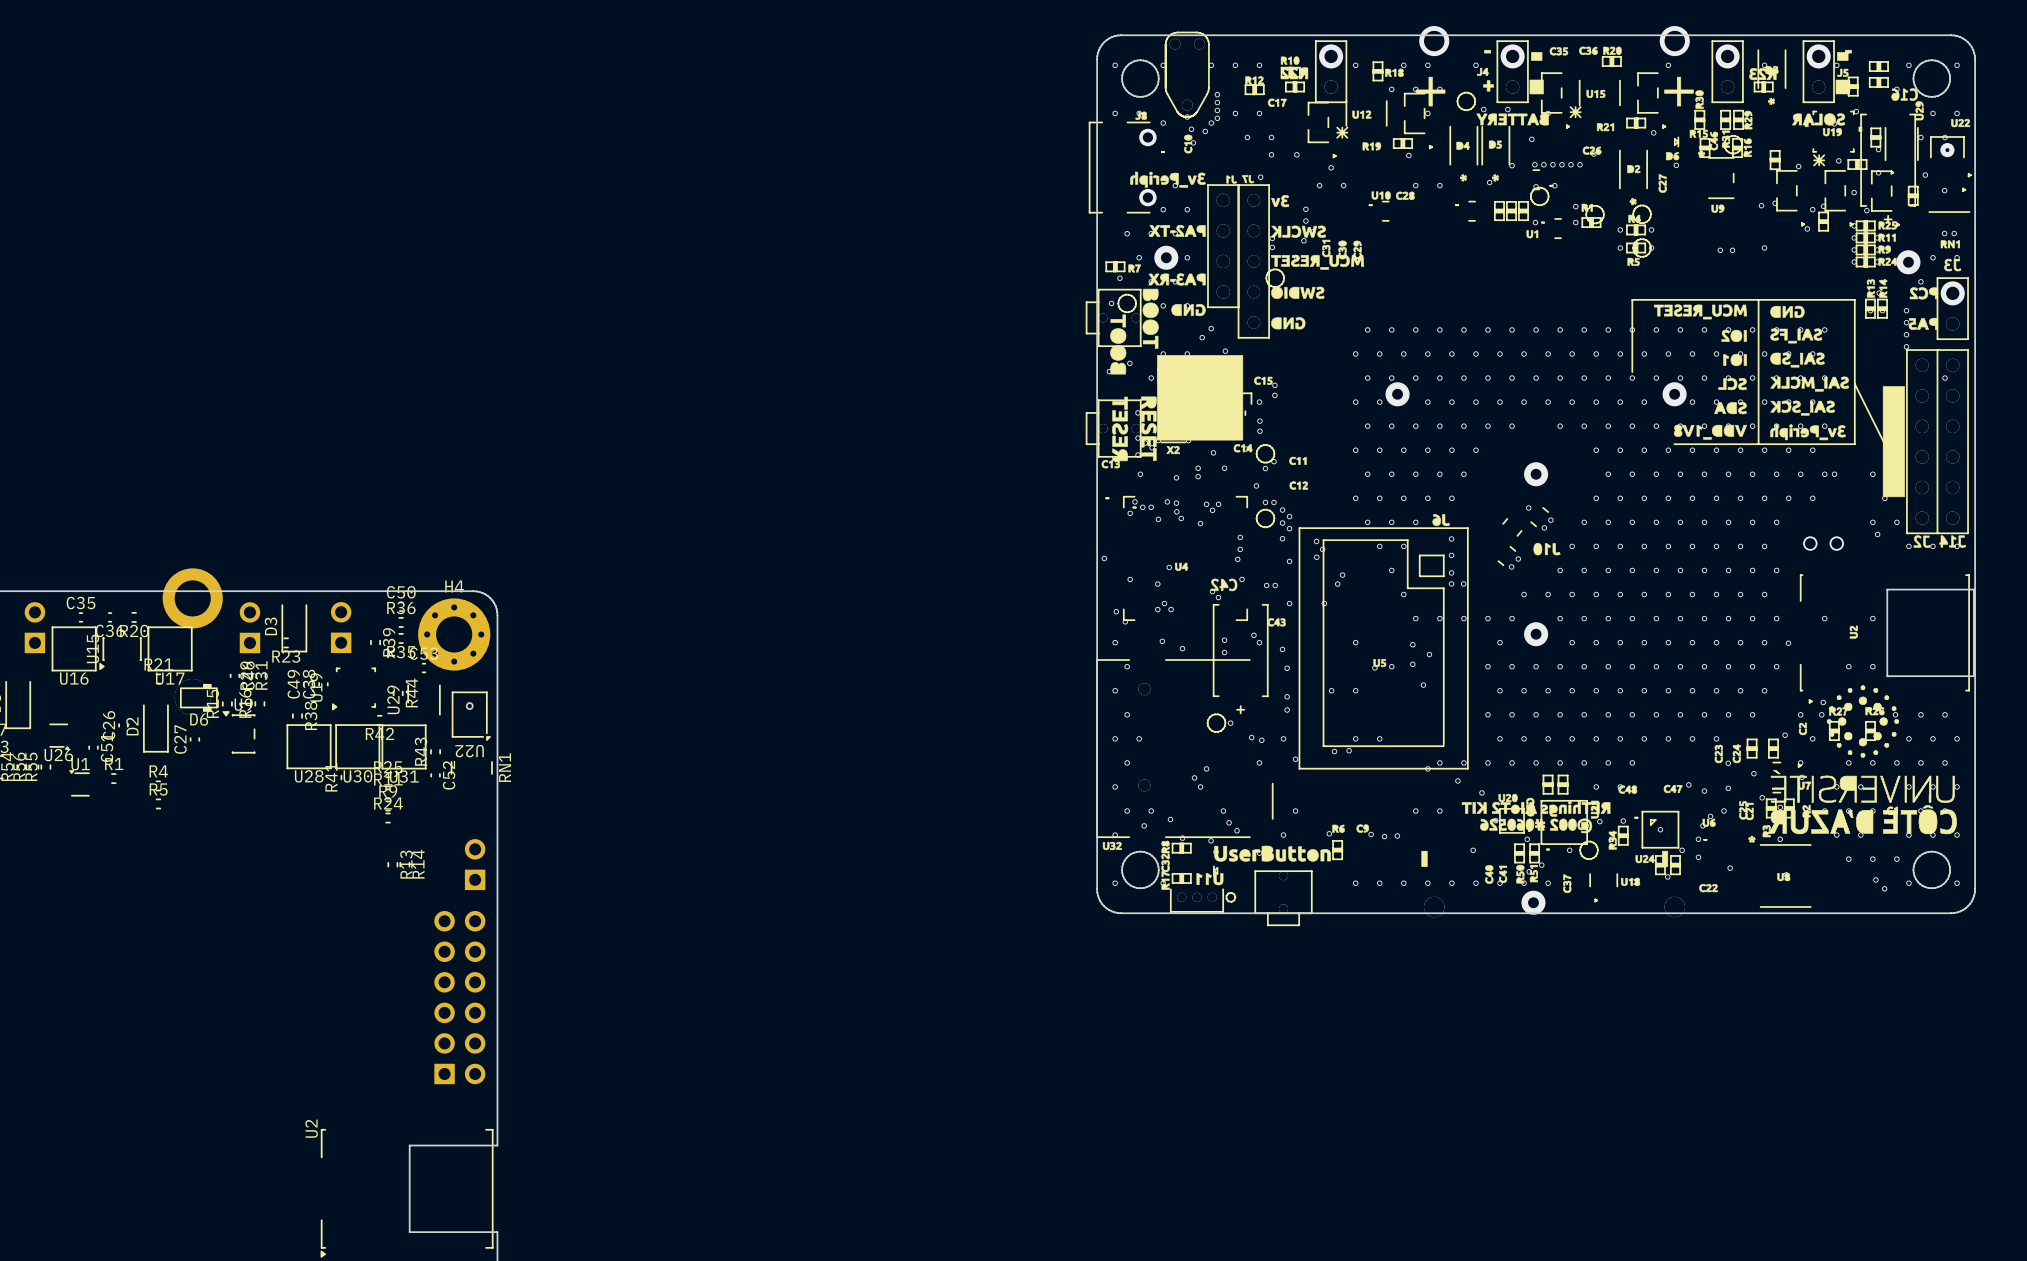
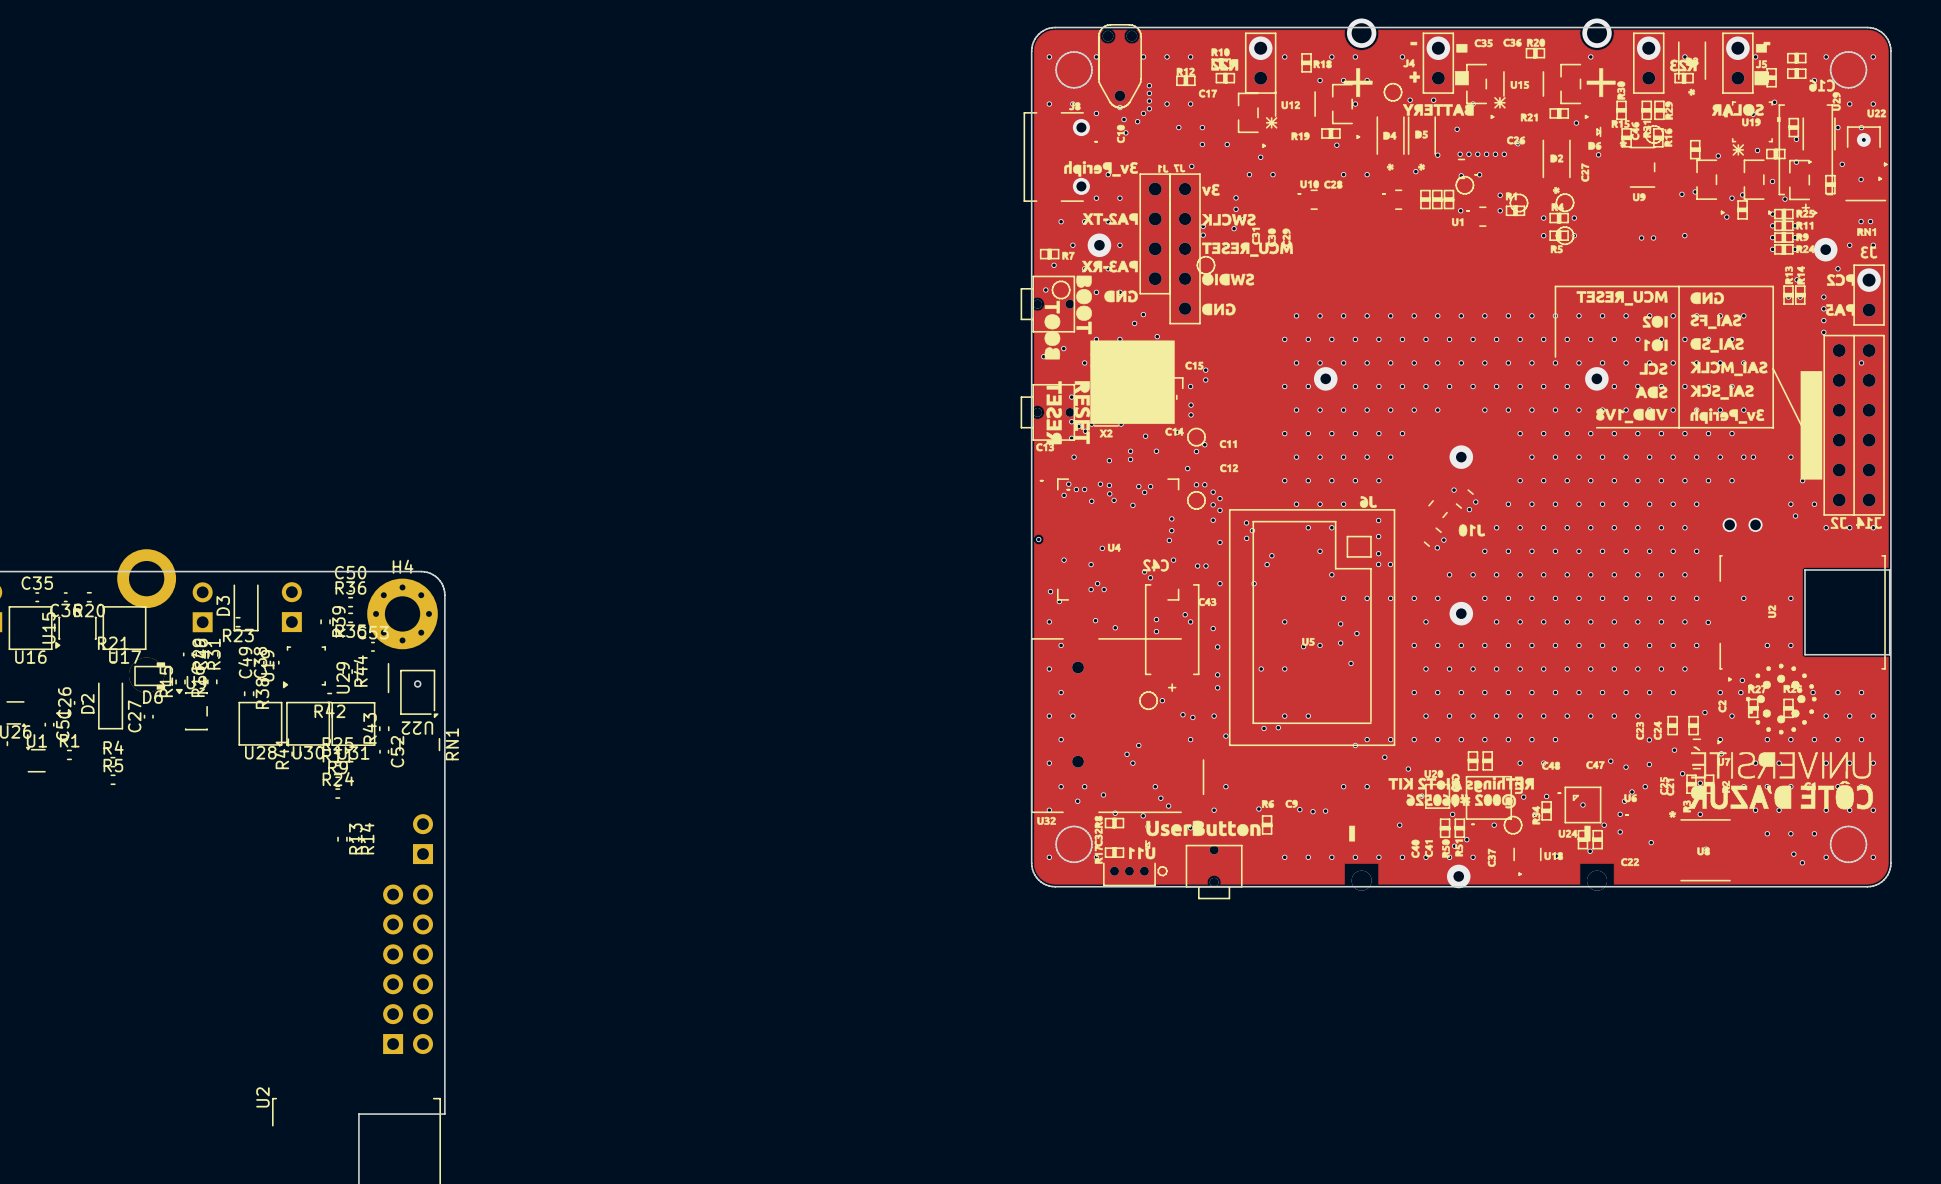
drawing: none -> [1033, 29, 1889, 885]

